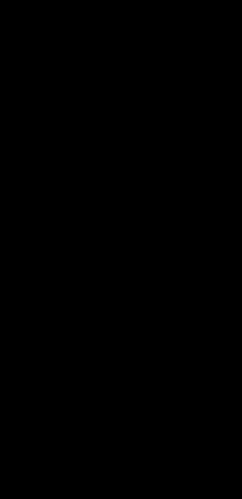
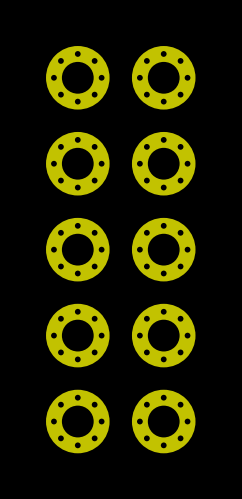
part: none -> (77, 77)
part: none -> (163, 77)
part: none -> (77, 163)
part: none -> (163, 163)
part: none -> (77, 249)
part: none -> (163, 249)
part: none -> (77, 335)
part: none -> (163, 335)
part: none -> (77, 421)
part: none -> (163, 421)

